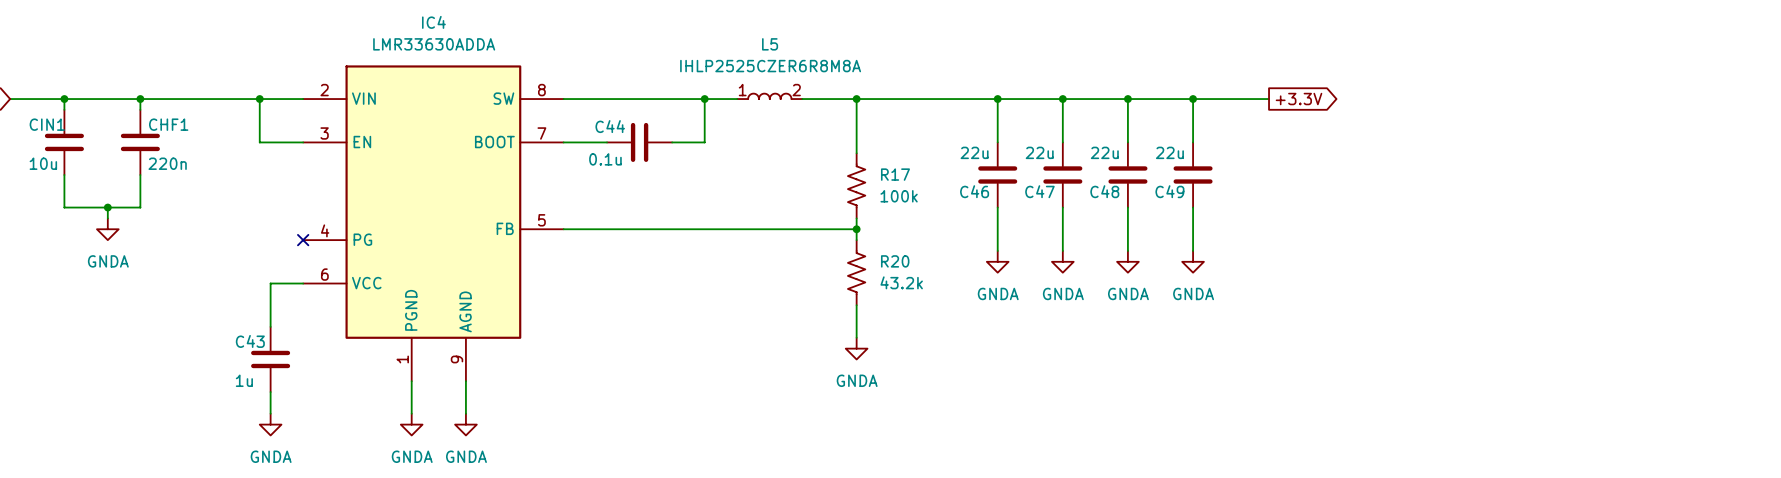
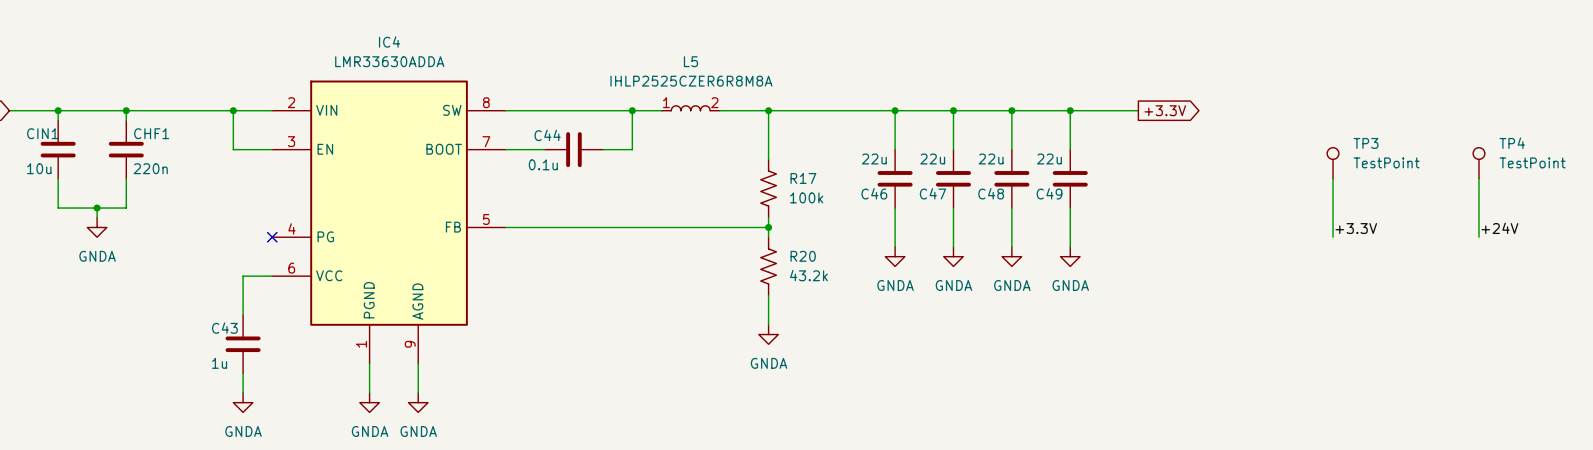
TP3: none -> TestPoint (1333, 163)
TP4: none -> TestPoint (1478, 163)
wire: none -> (1333, 178) (1333, 237)
wire: none -> (1478, 178) (1478, 237)
label: none -> +3.3V (1356, 228)
label: none -> +24V (1499, 228)

